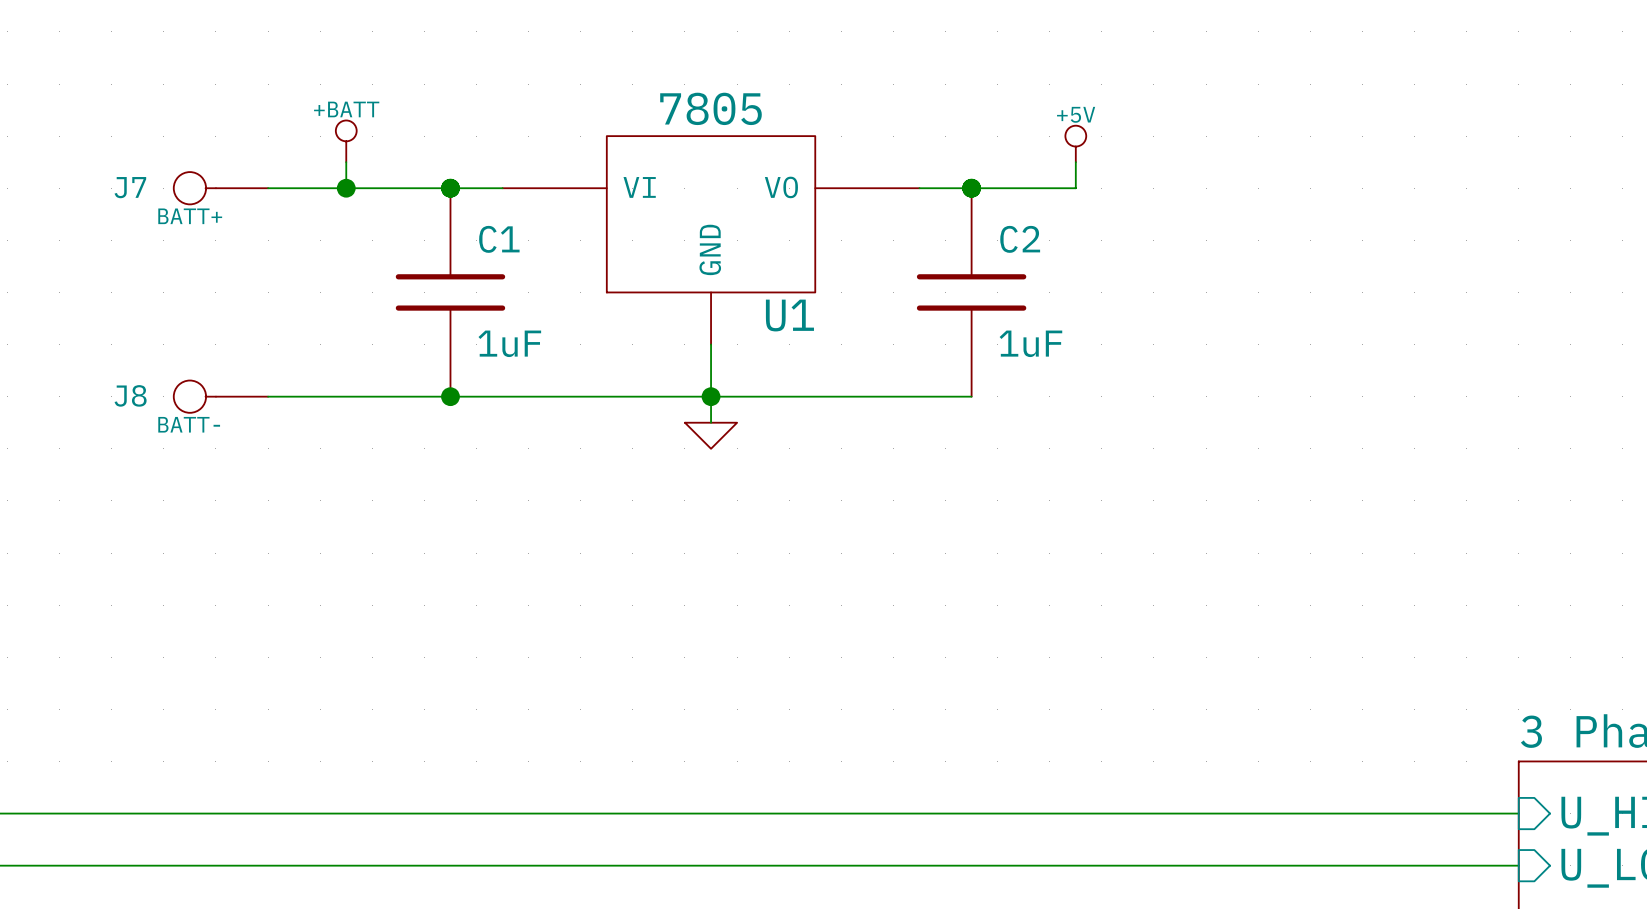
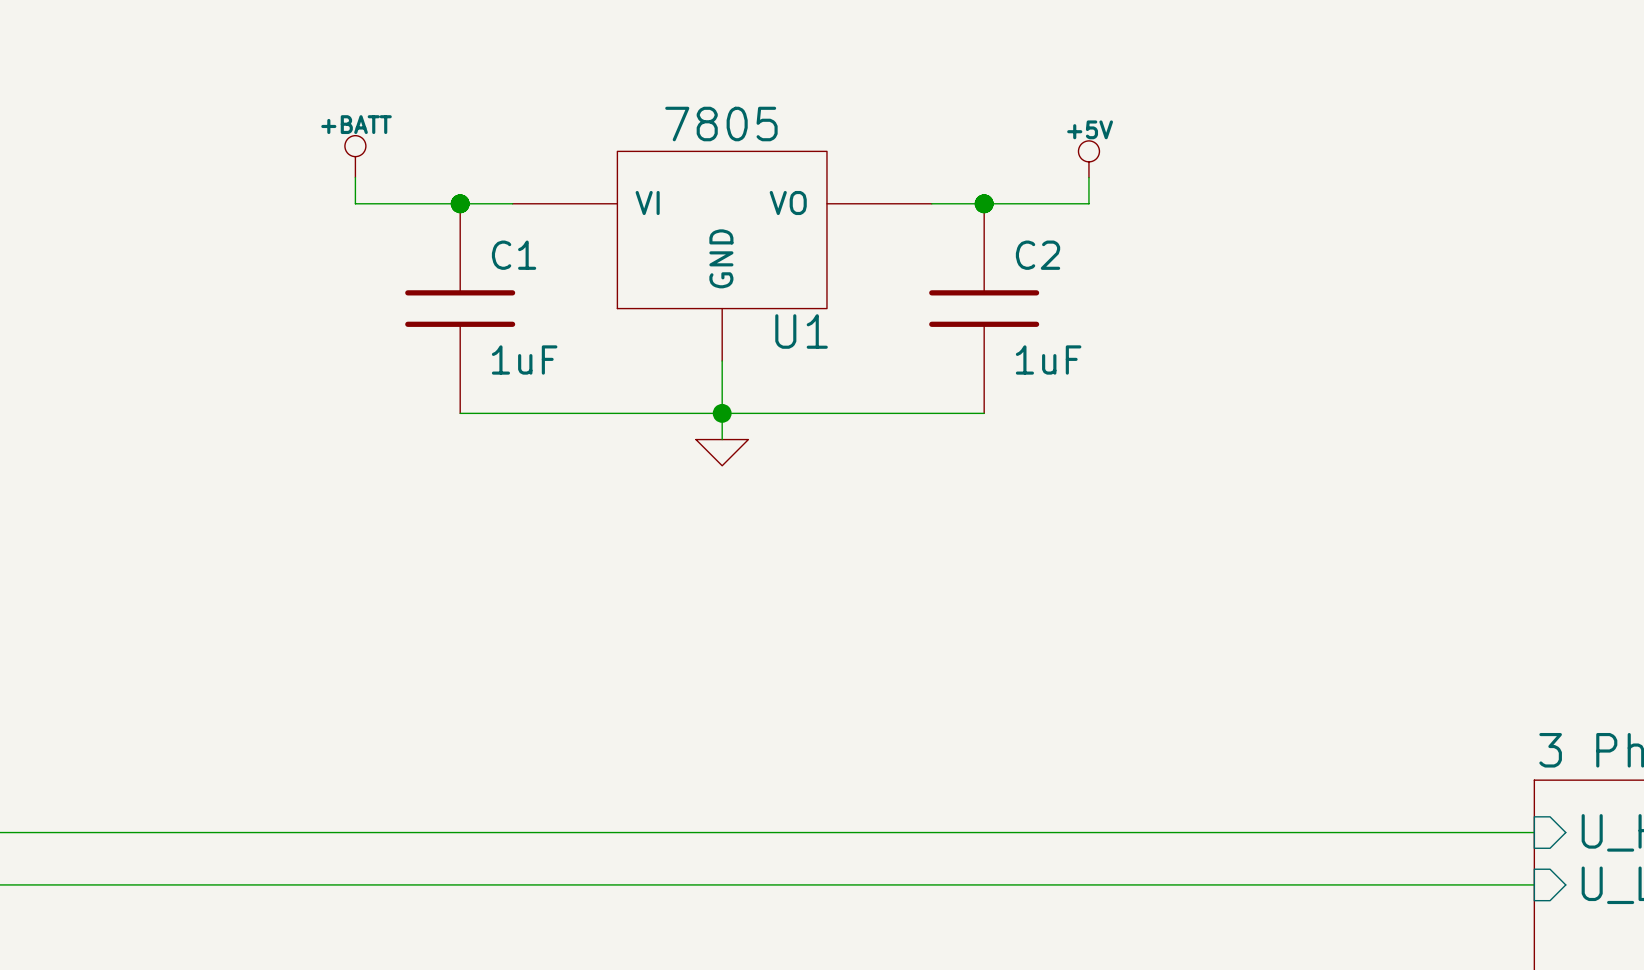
J7: BATT+ (220, 188) -> none
wire: (268, 188) (346, 188) -> none
junction: (346, 188) -> none
J8: BATT- (220, 396) -> none
wire: (268, 396) (450, 396) -> none
junction: (450, 396) -> none

